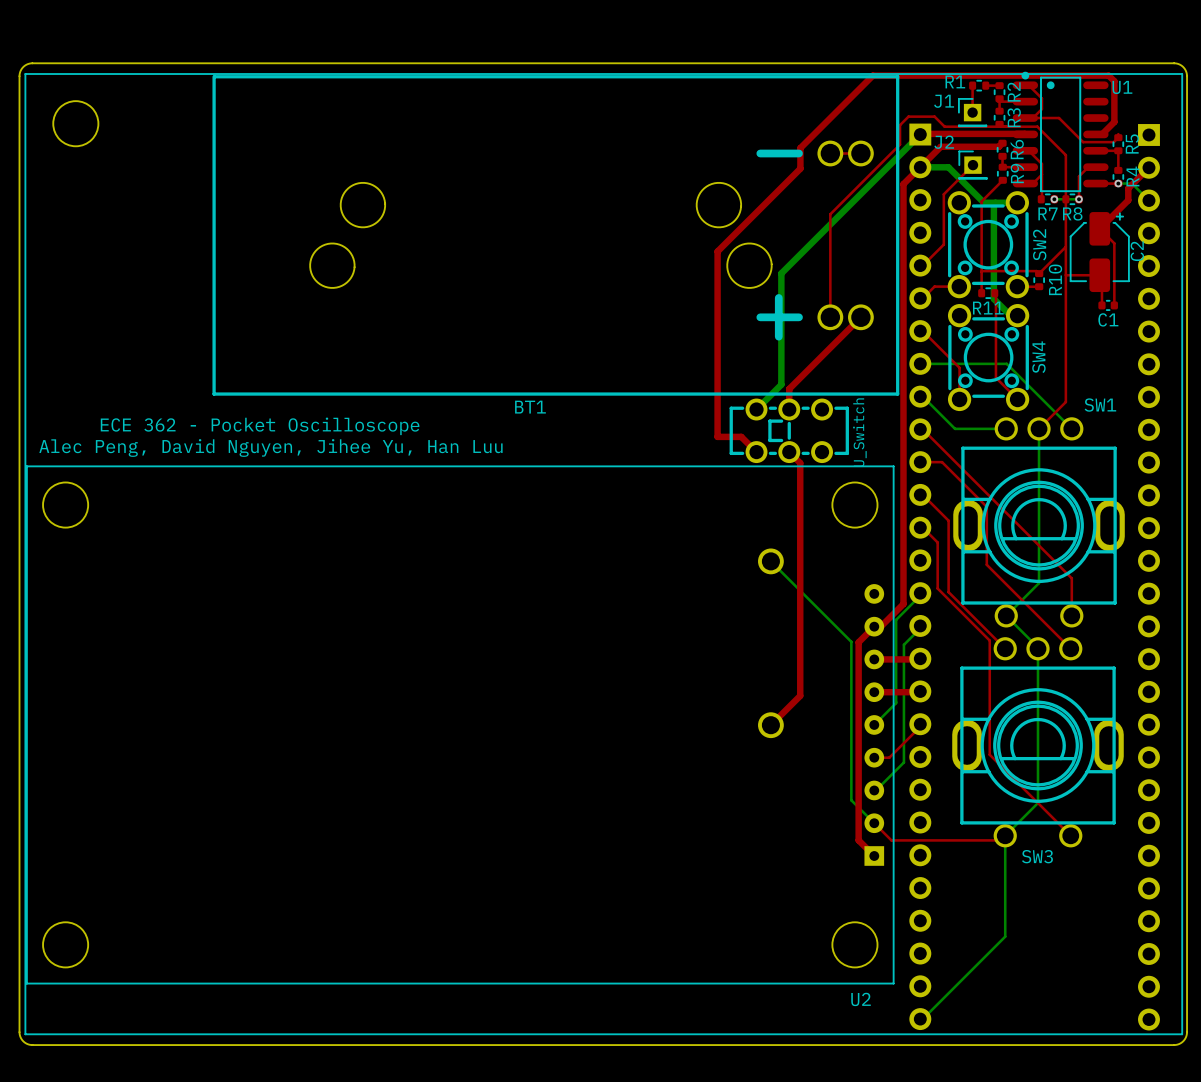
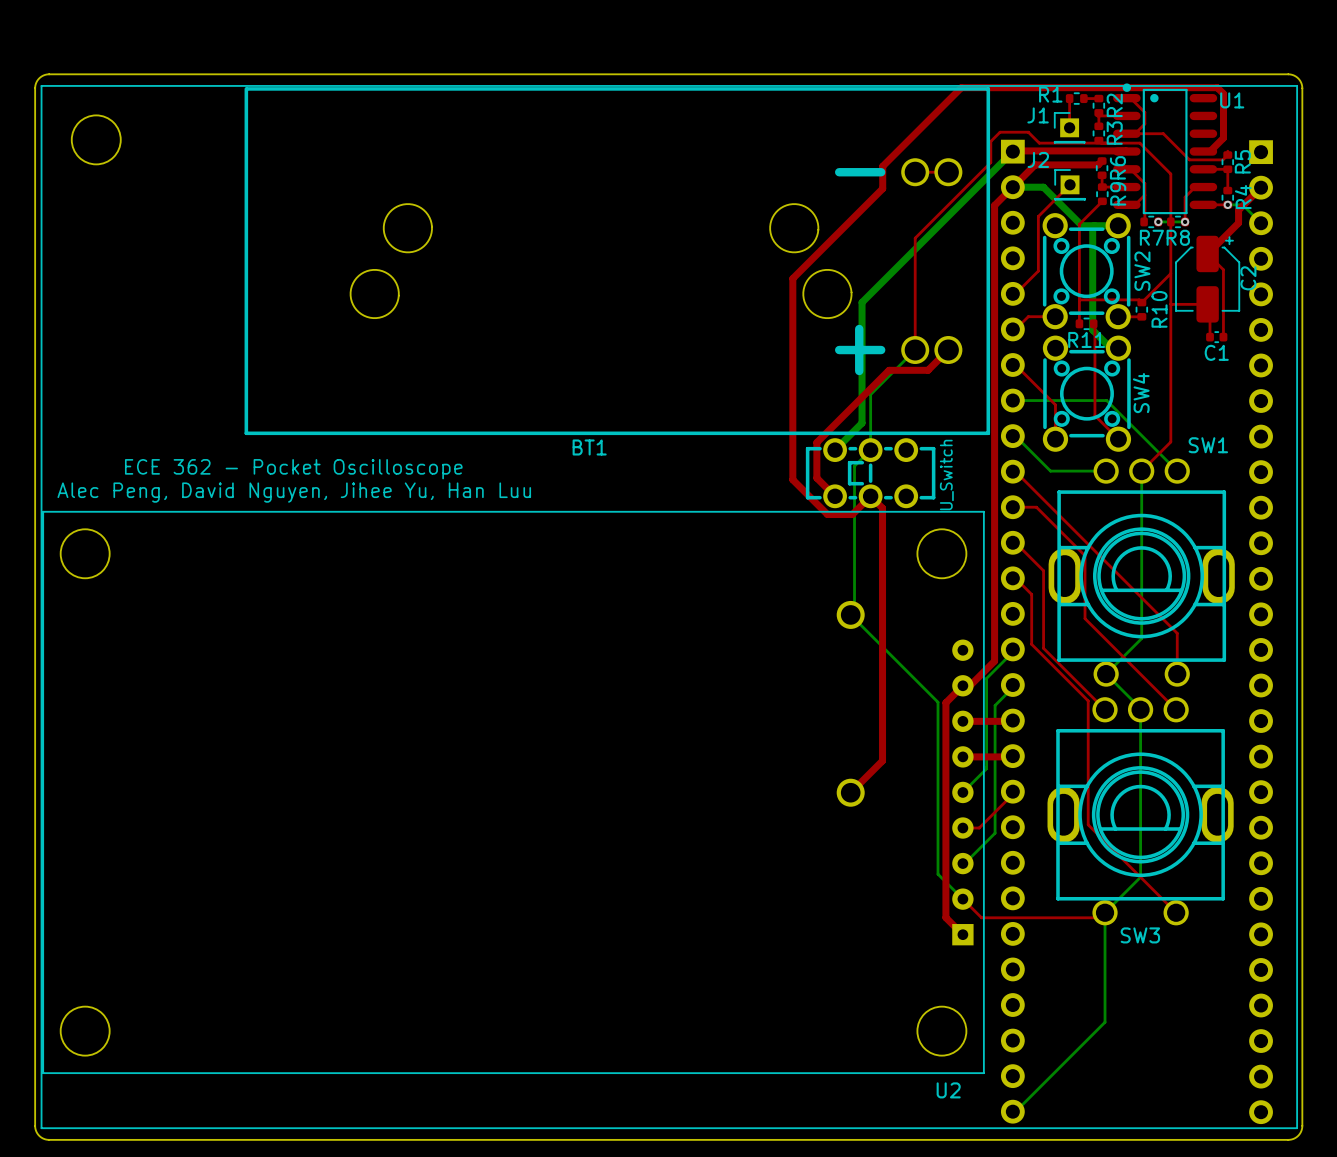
bottom track: none -> (915, 350) (870, 394) (870, 450) (854, 466) (854, 611)
top track: (842, 336) (789, 388) (789, 409) -> (928, 370) (889, 370) (816, 442) (816, 478) (818, 479)
top track: (717, 436) (741, 436) -> (792, 479) (827, 514) (852, 514) (870, 496)

